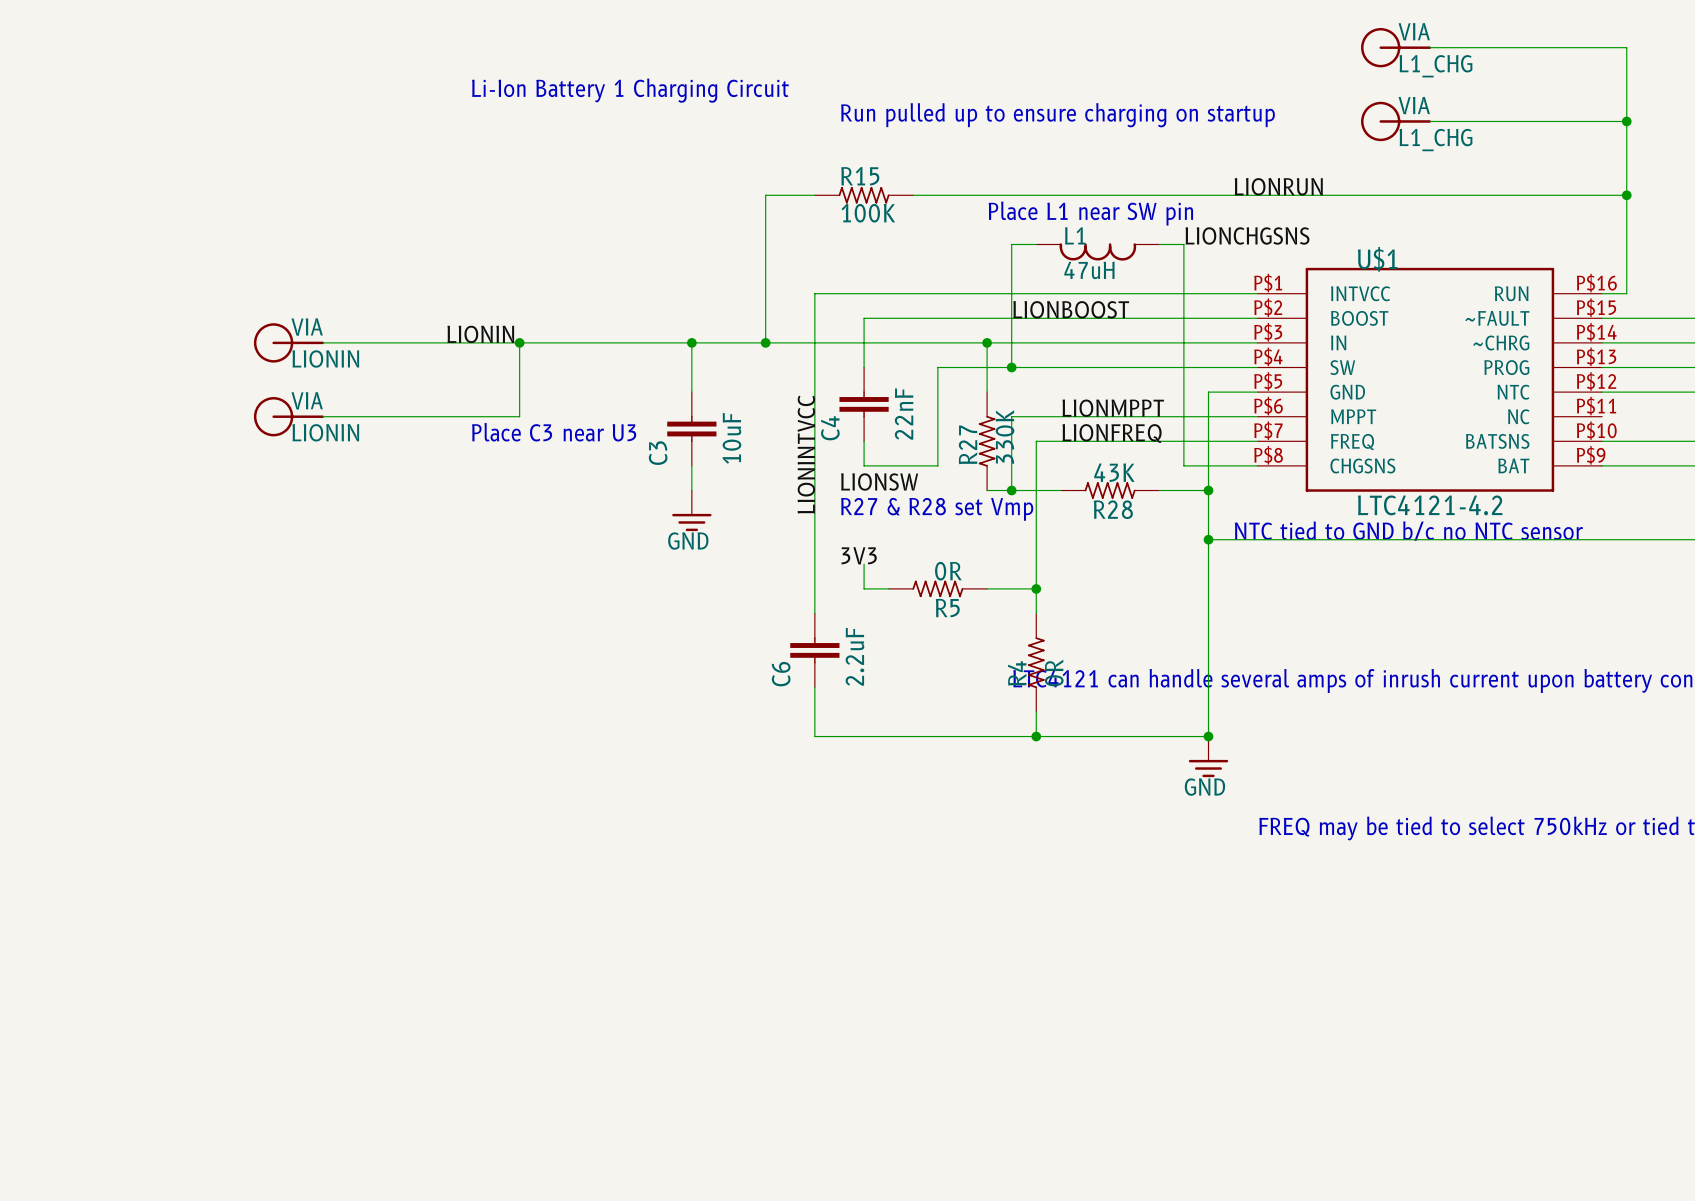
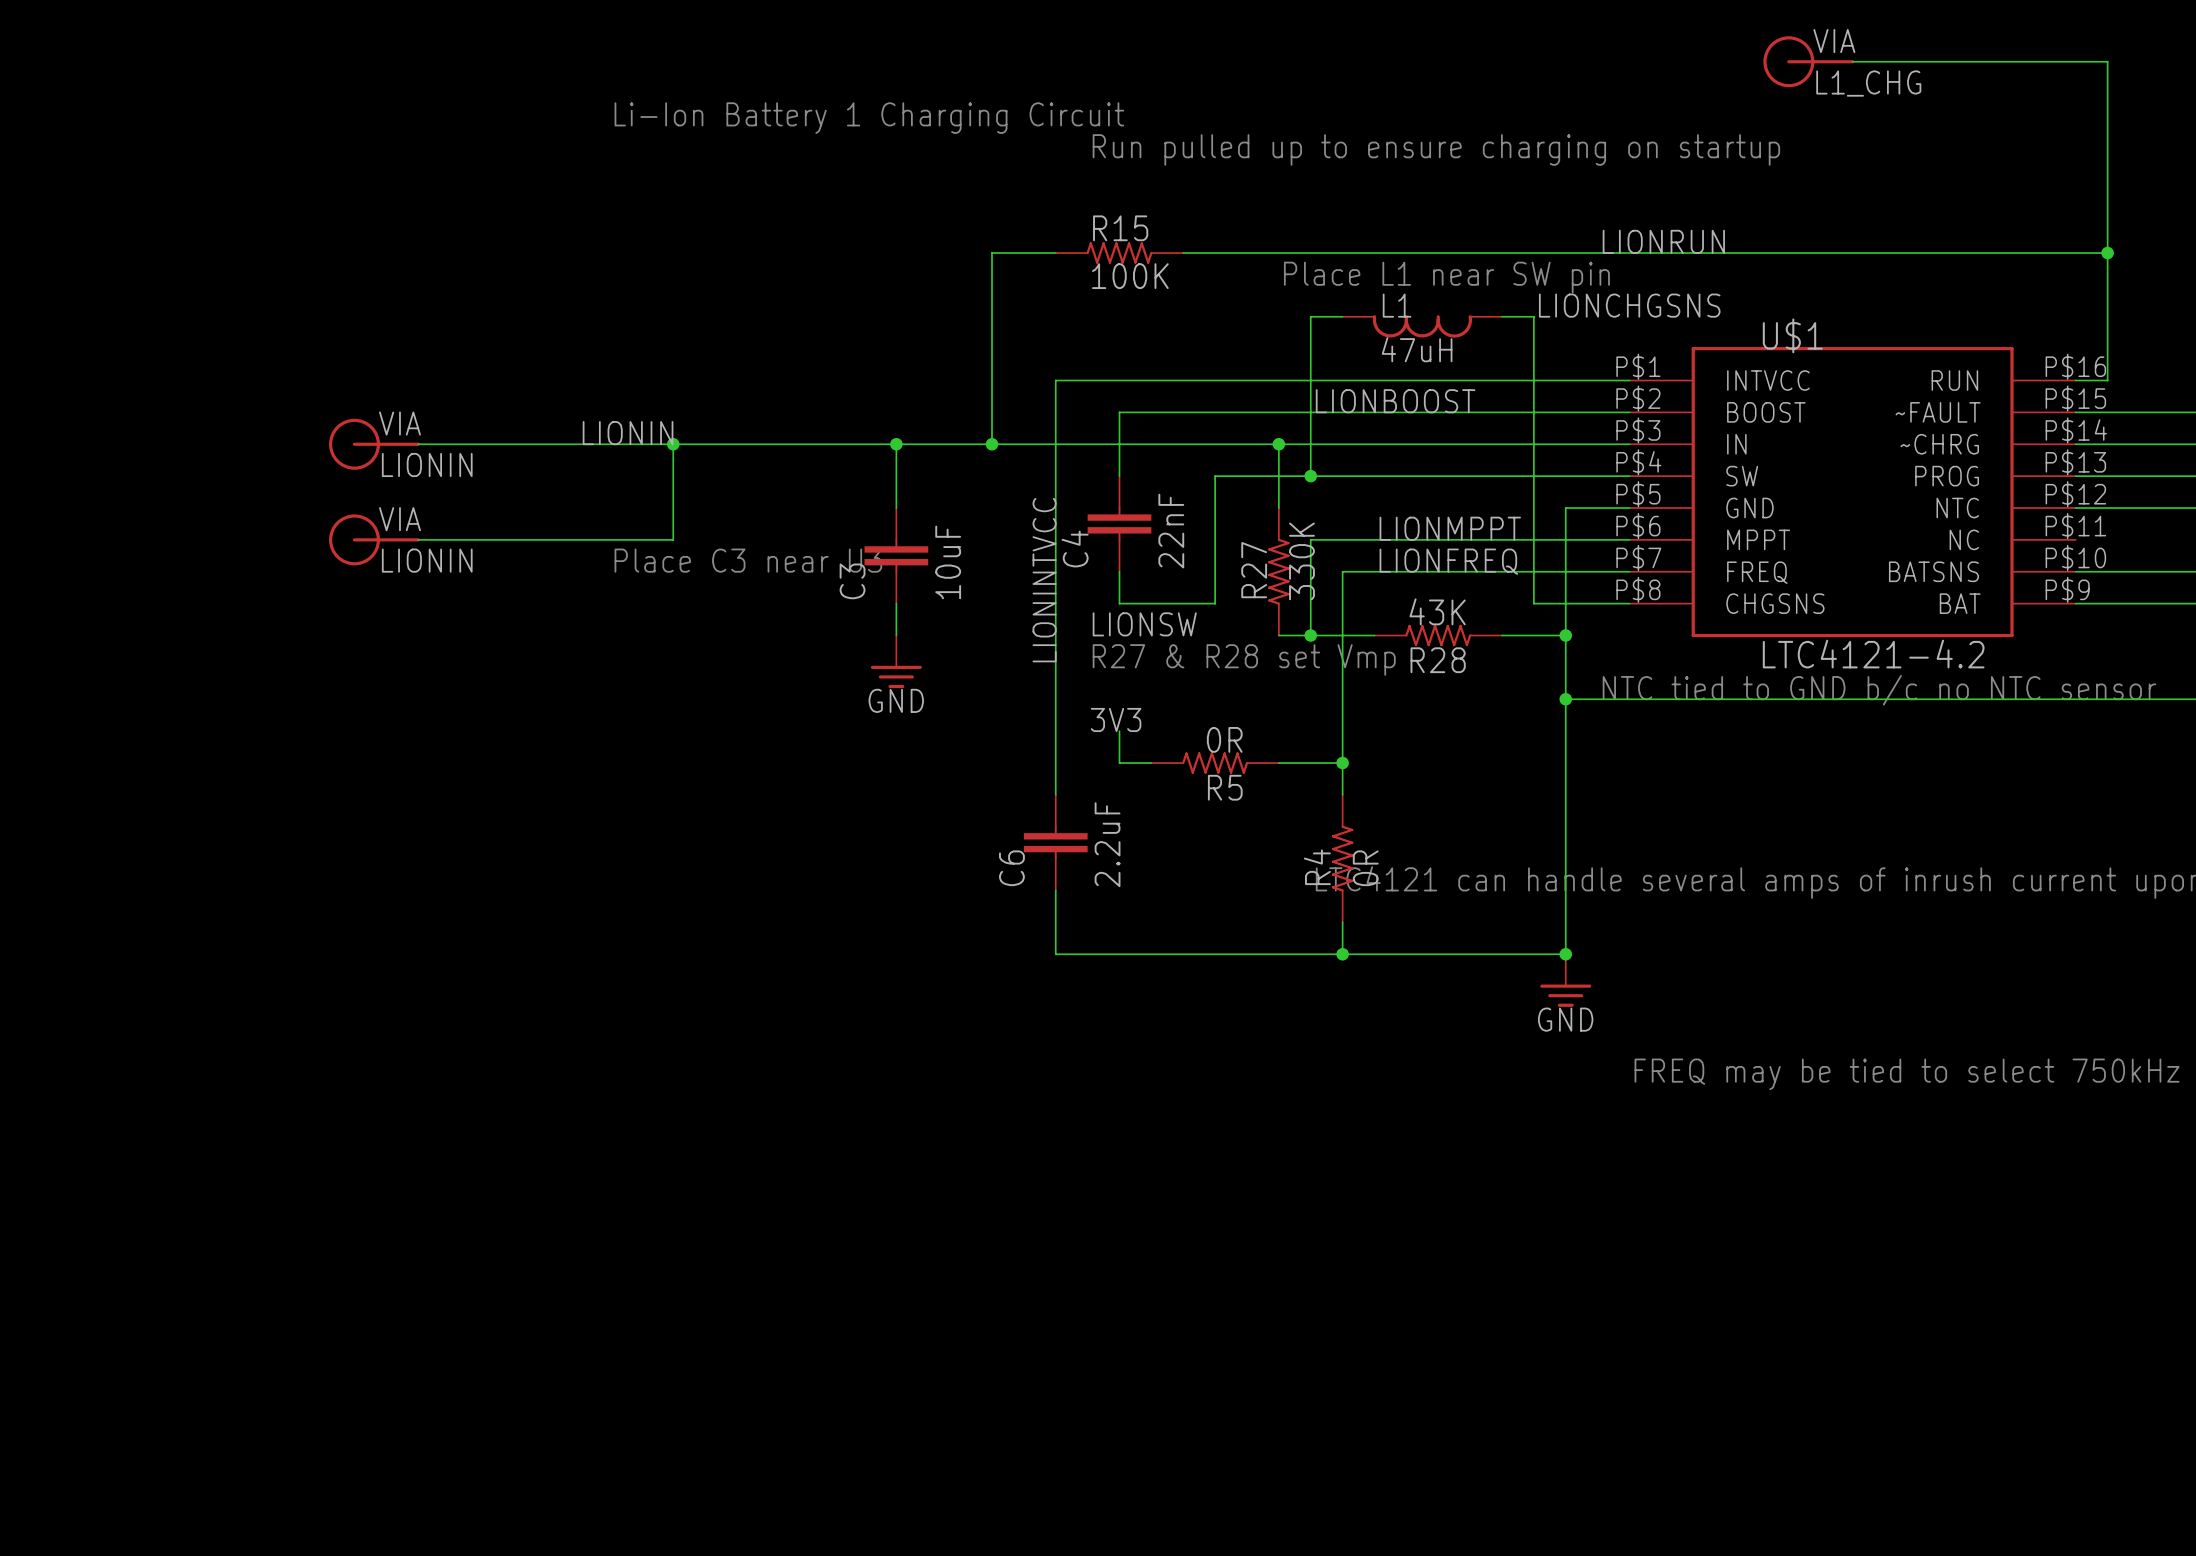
part: L1_CHG (1396, 121) -> none
wire: (1429, 121) (1626, 121) -> none
junction: (1626, 121) -> none

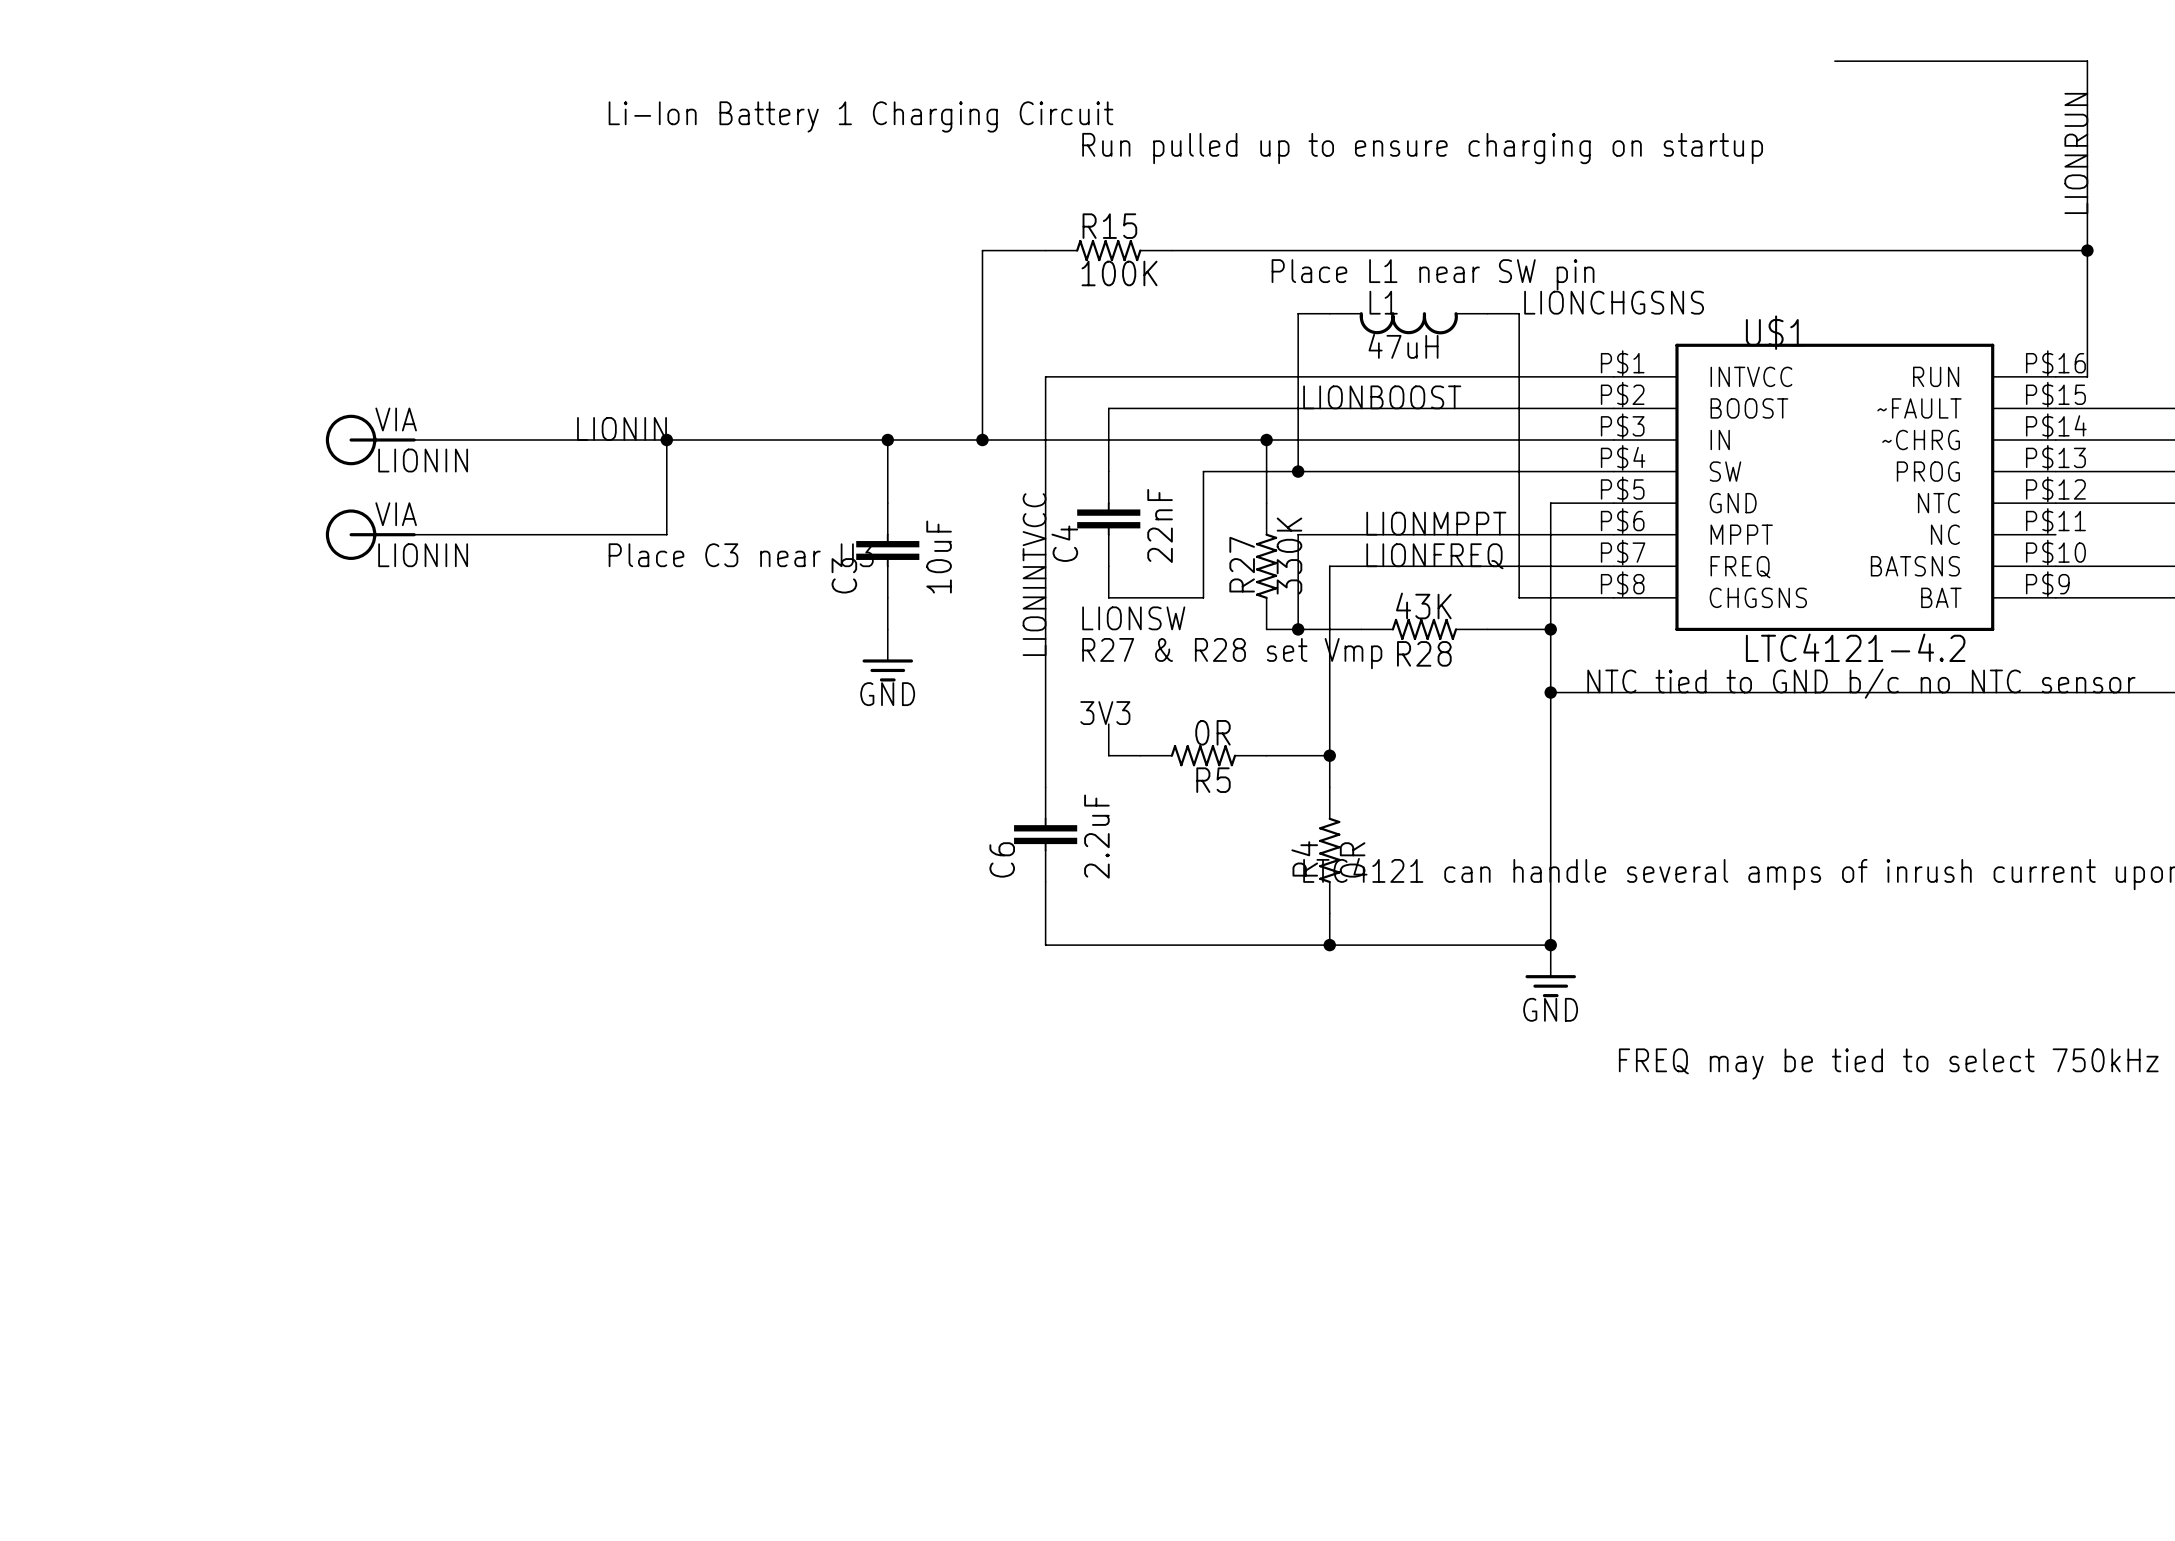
part: L1_CHG (1808, 61) -> none
label: none -> LIONRUN (2076, 153)
label: LIONRUN (1663, 241) -> none

